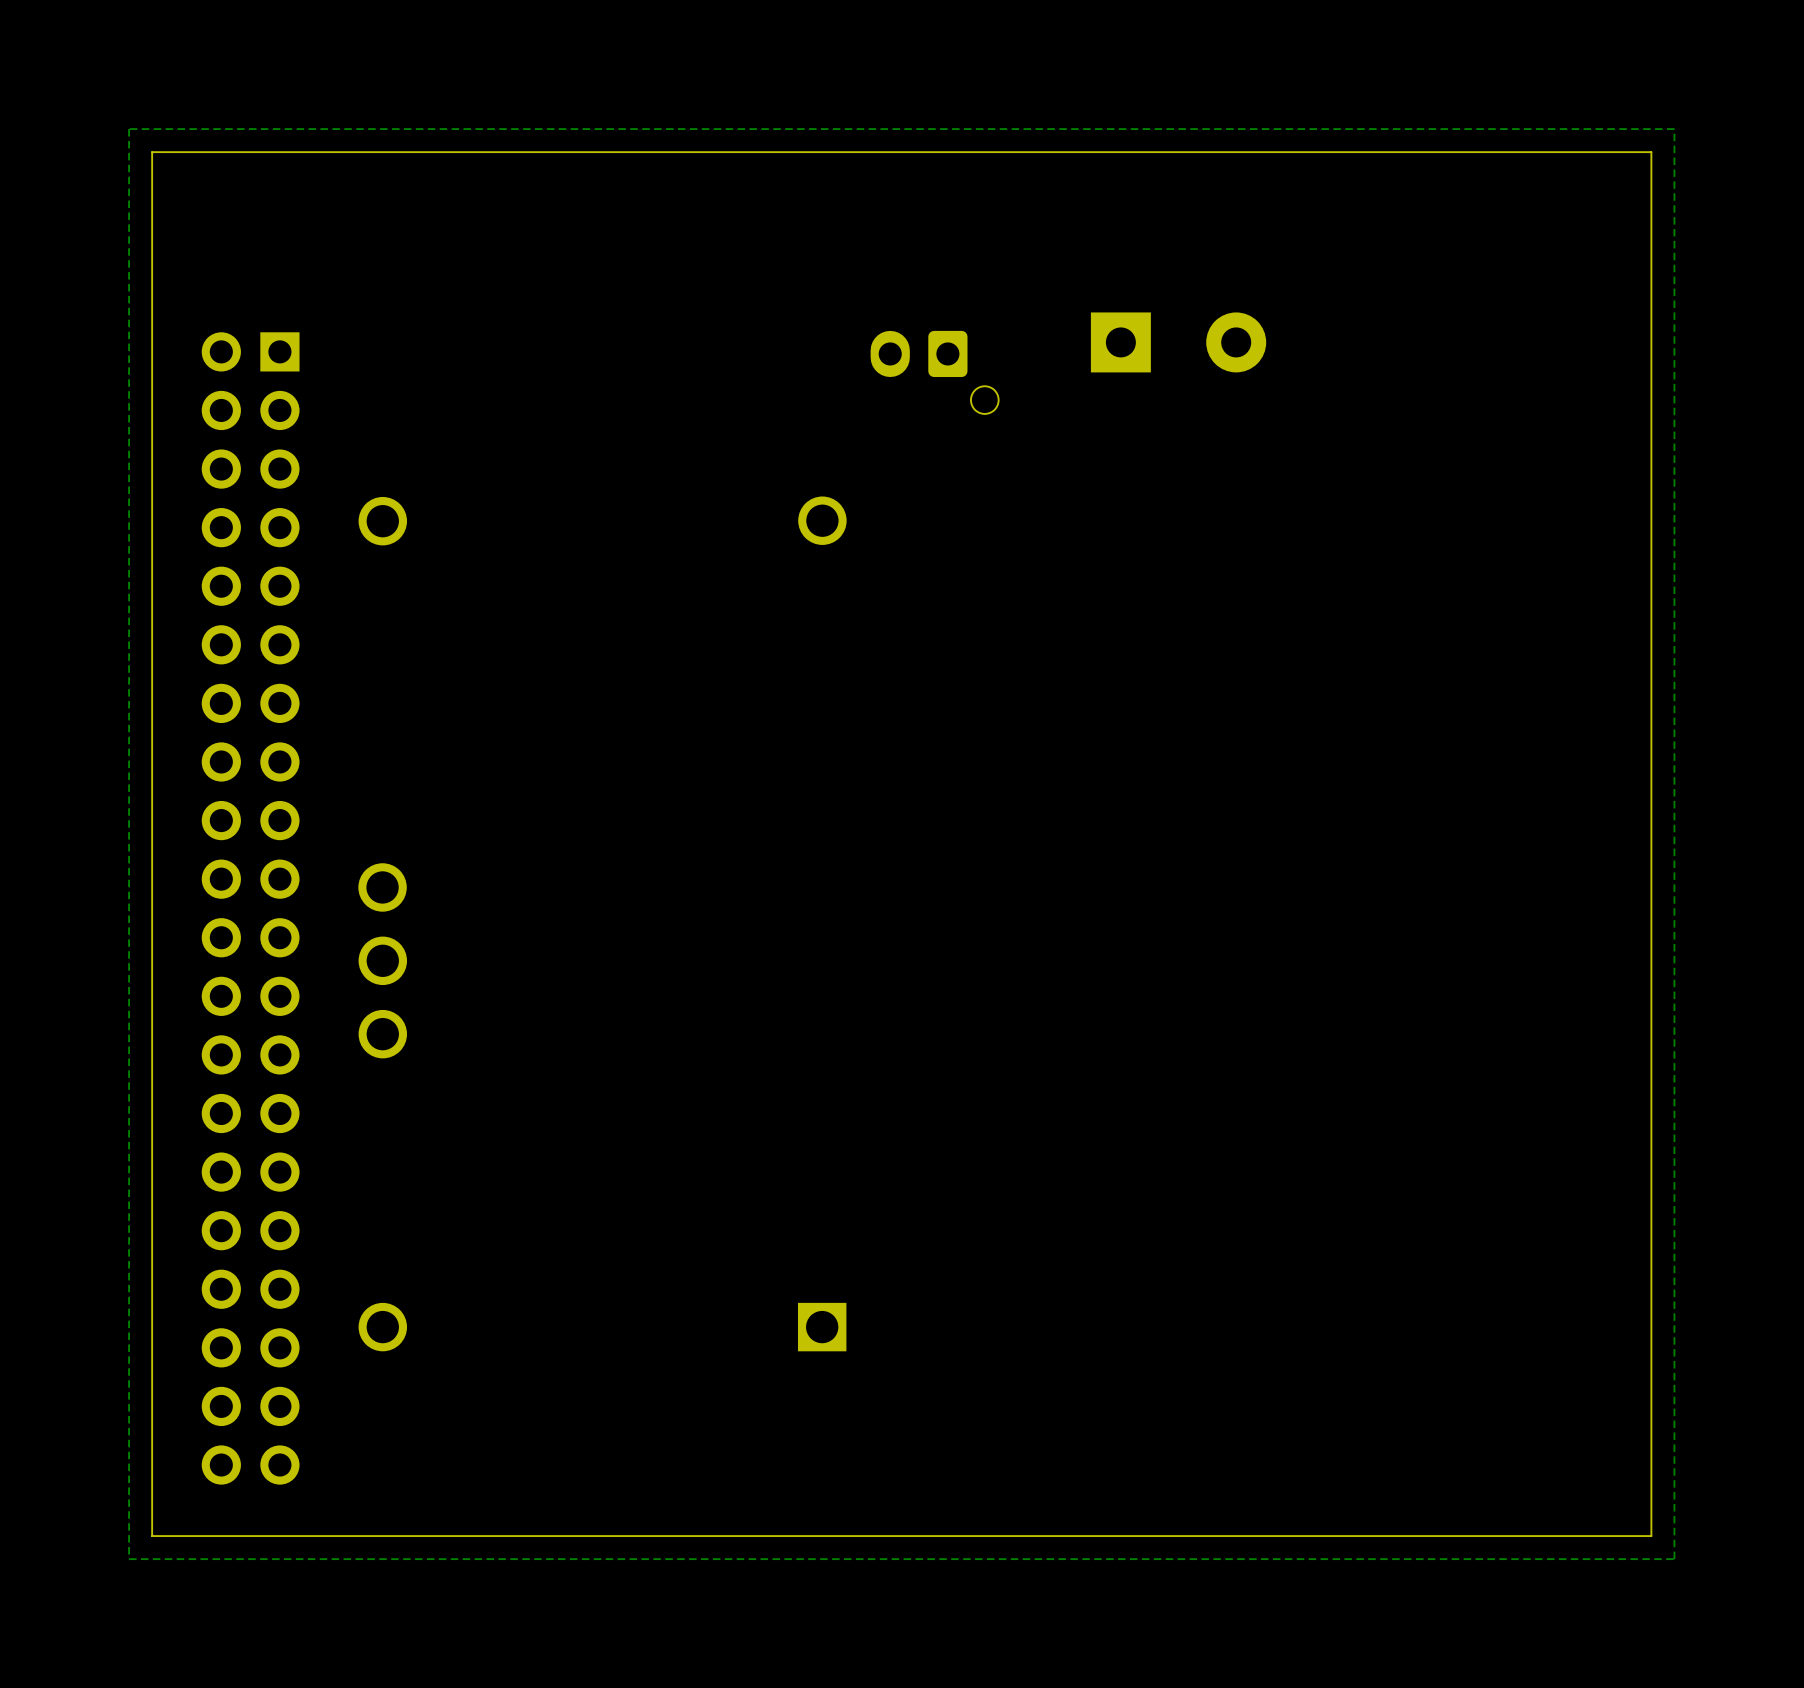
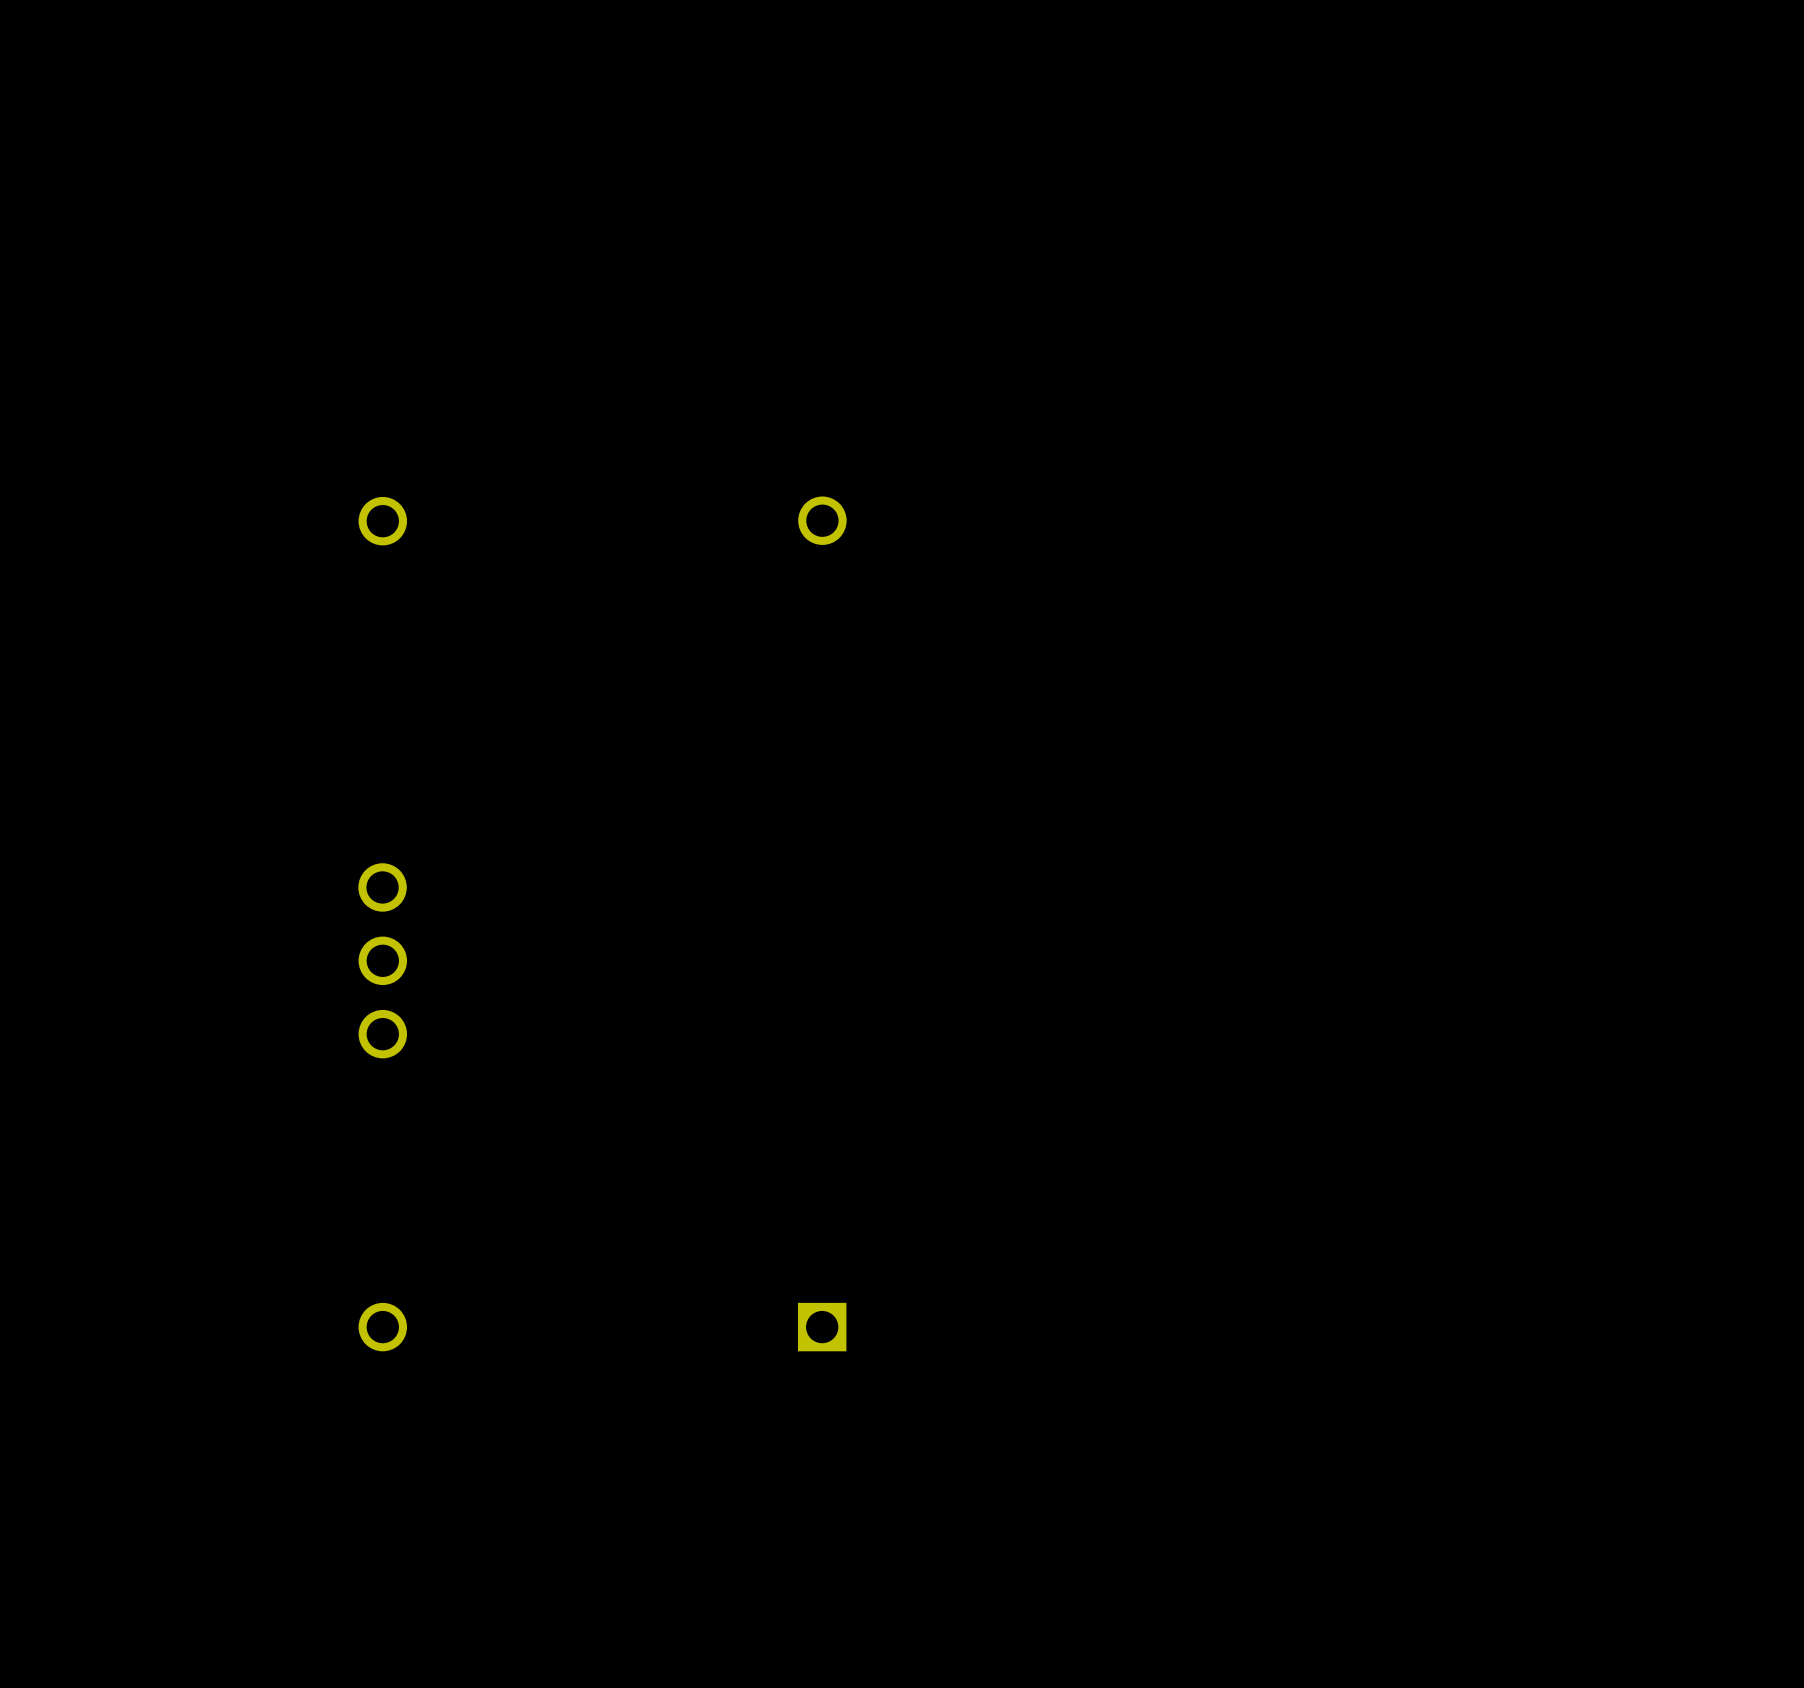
zone outline: (1674, 129) (1674, 1559) (129, 1559) (129, 129) (1674, 129) -> none
board edge: (1651, 152) (1651, 1536) (152, 1536) (152, 152) (1651, 152) -> none
part: (1178, 342) -> none
part: (934, 372) -> none
part: (250, 908) -> none

